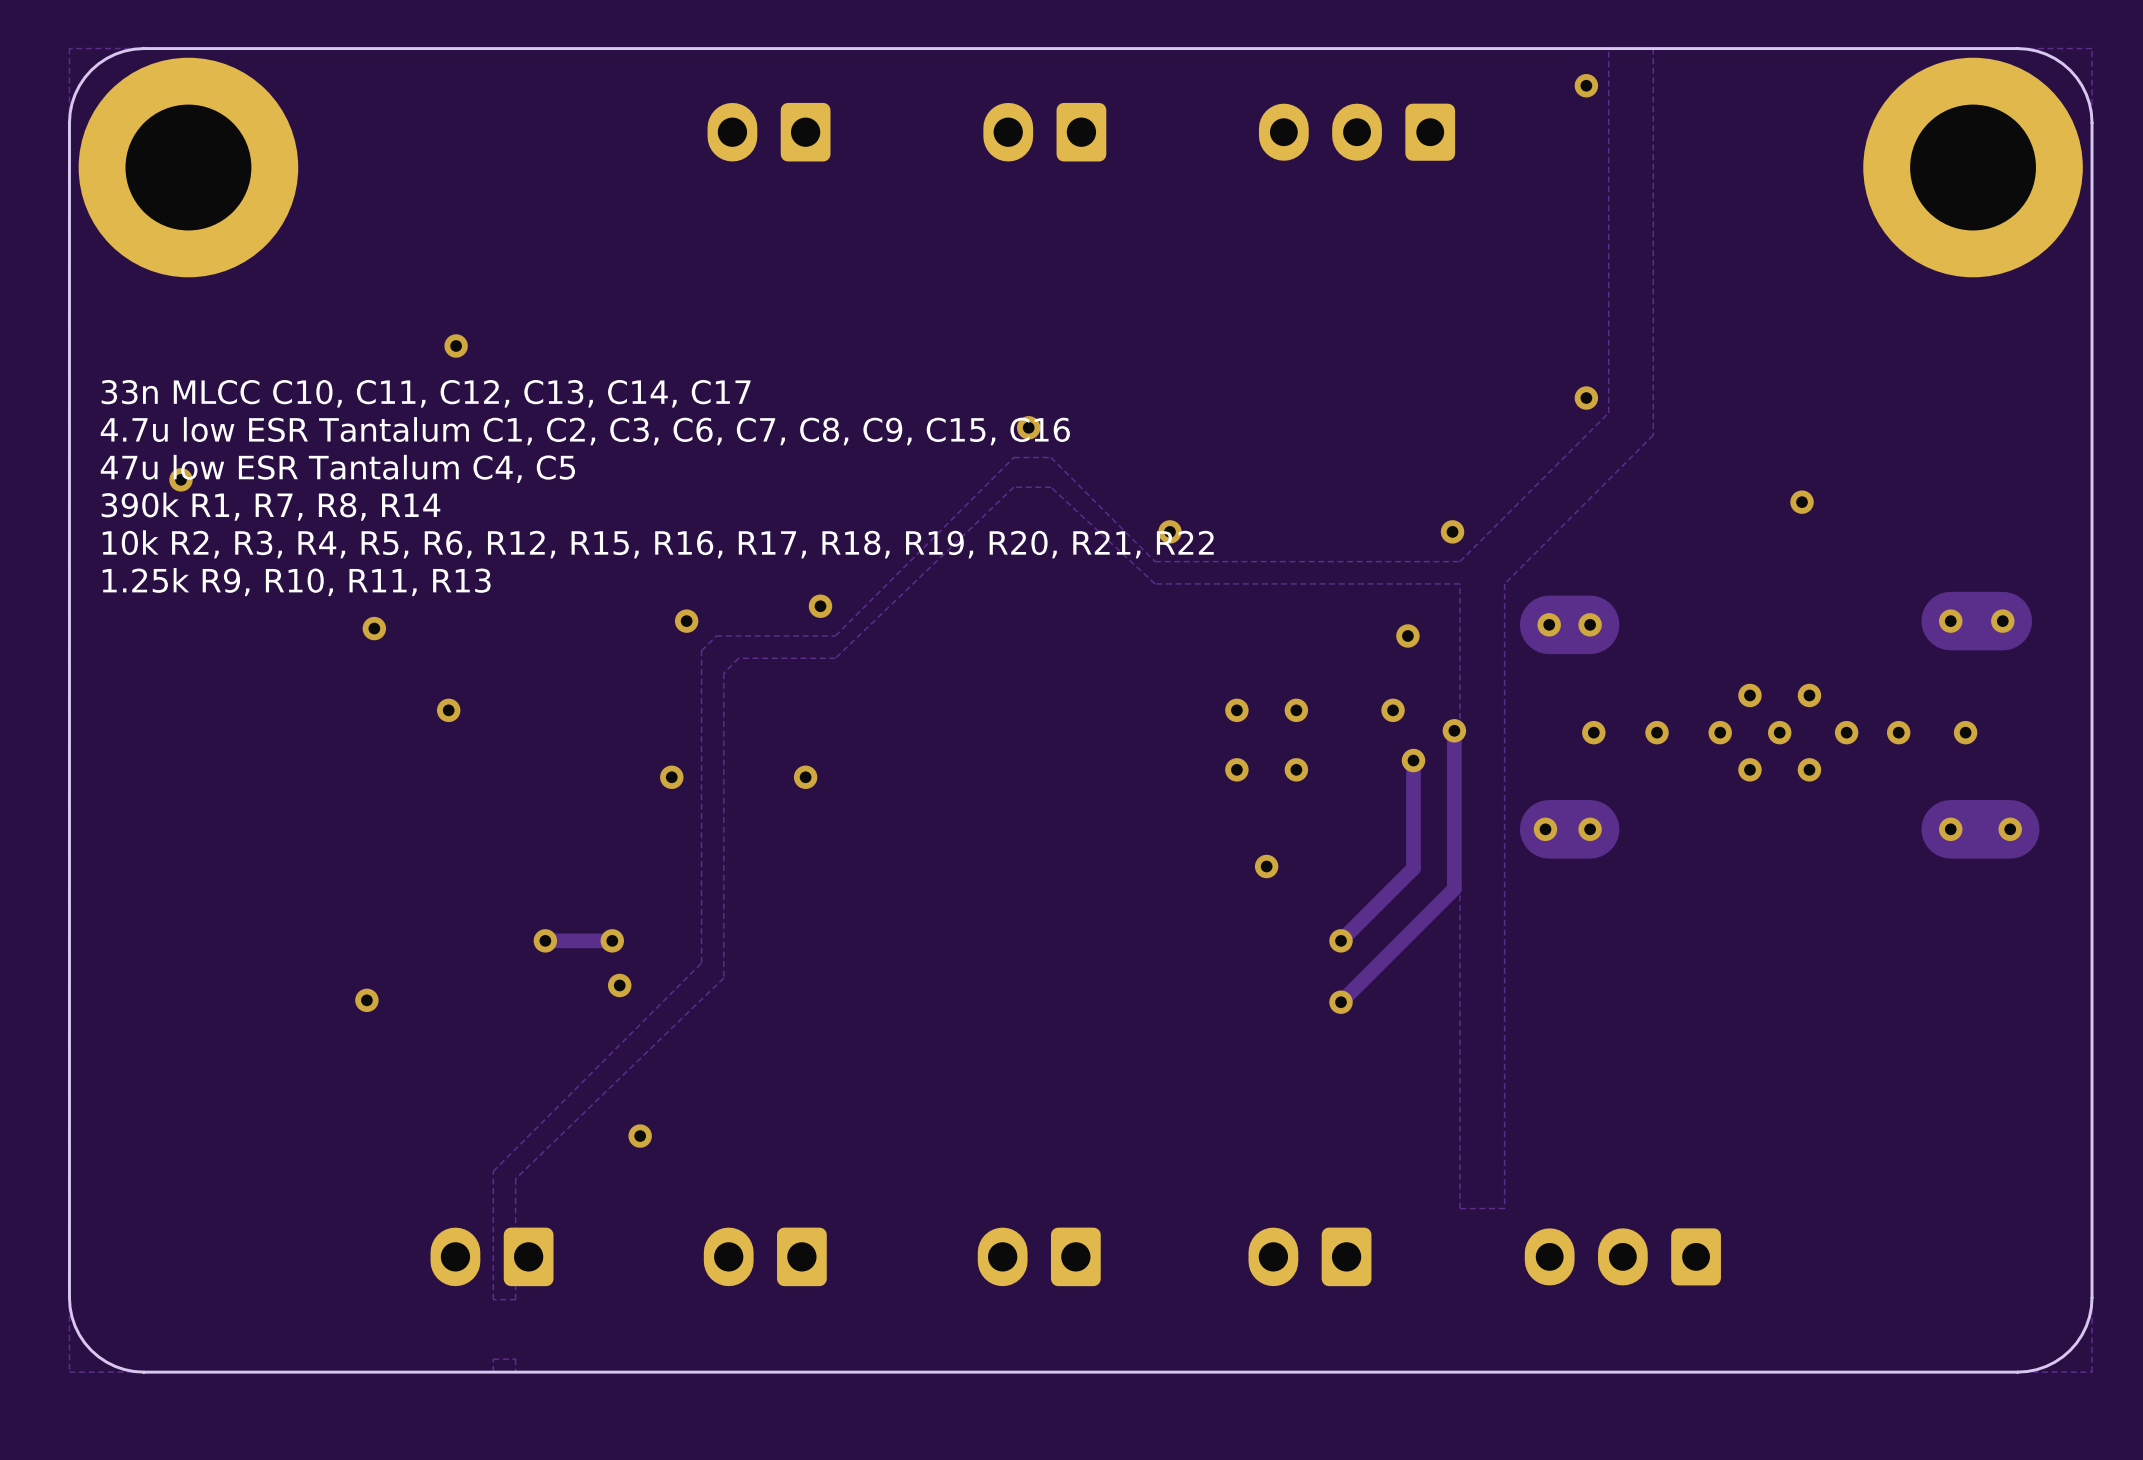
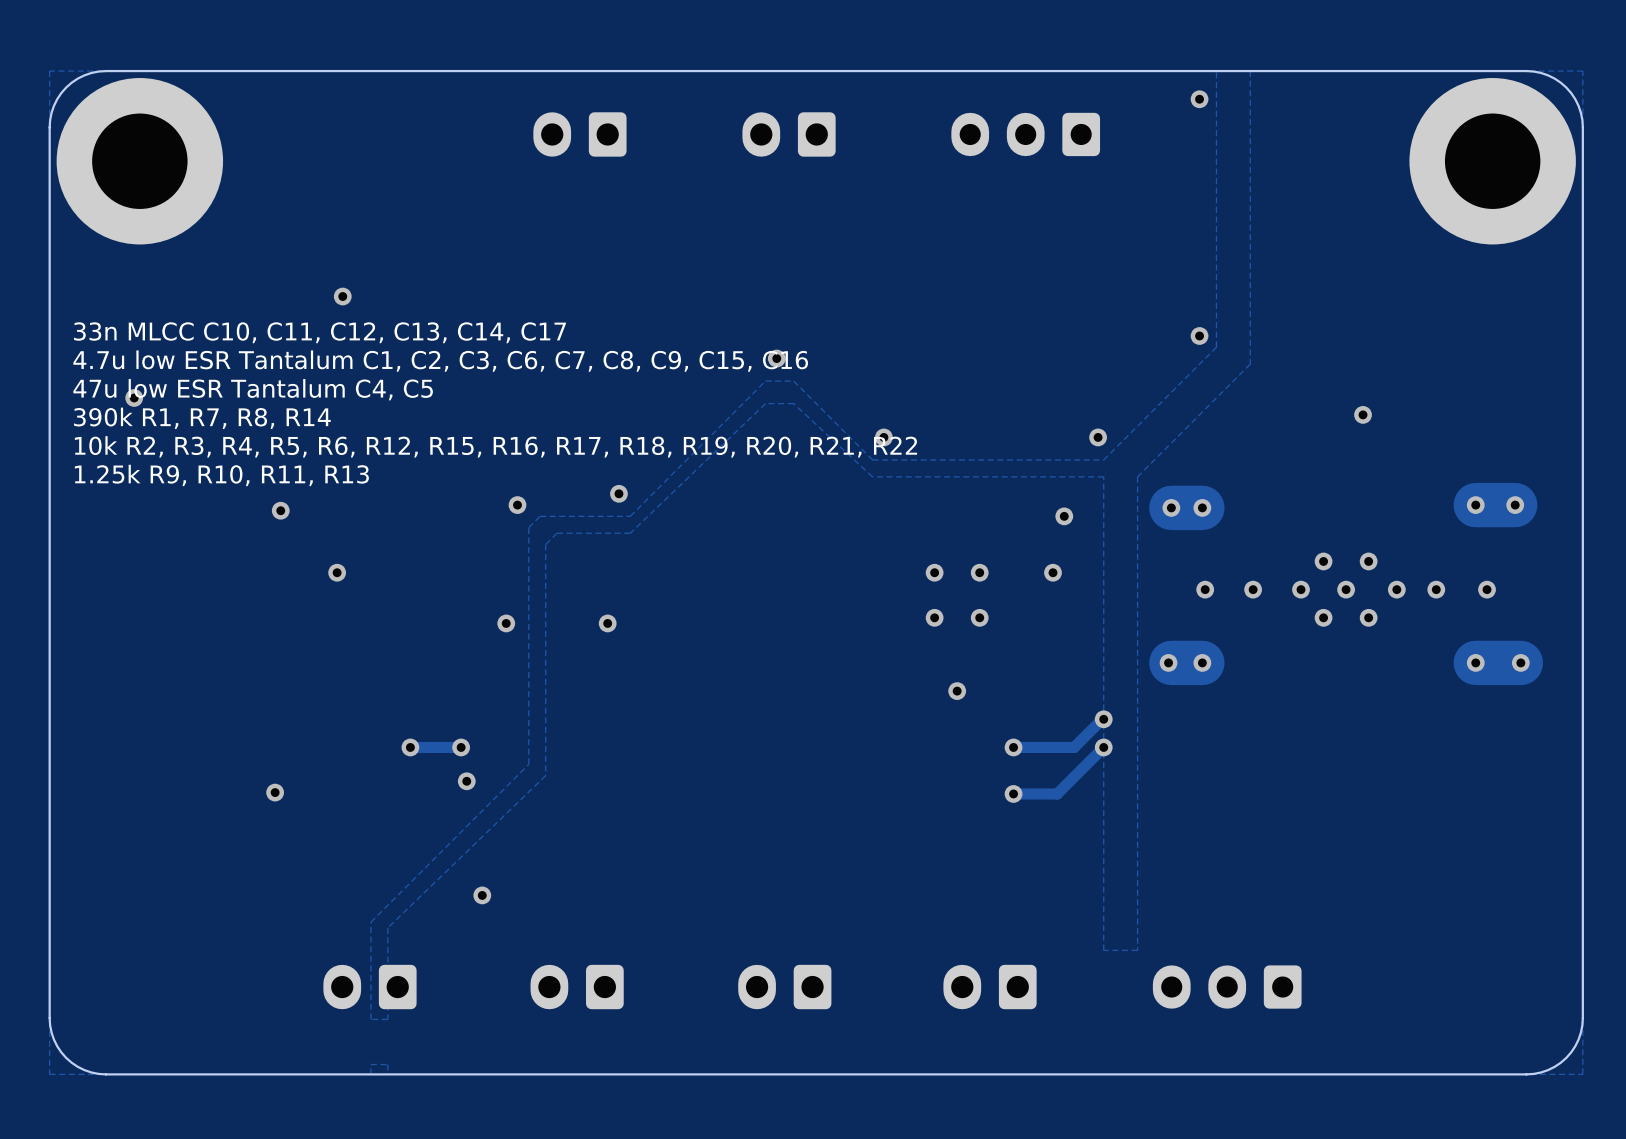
track: (1454, 730) (1454, 888) (1341, 1002) -> (1103, 747) (1057, 793) (1013, 793)
via: (1454, 730) -> none
track: (1413, 760) (1413, 868) (1341, 940) -> (1103, 719) (1074, 747) (1013, 747)
via: (1413, 760) -> none
via: none -> (1103, 719)
via: none -> (1103, 747)

